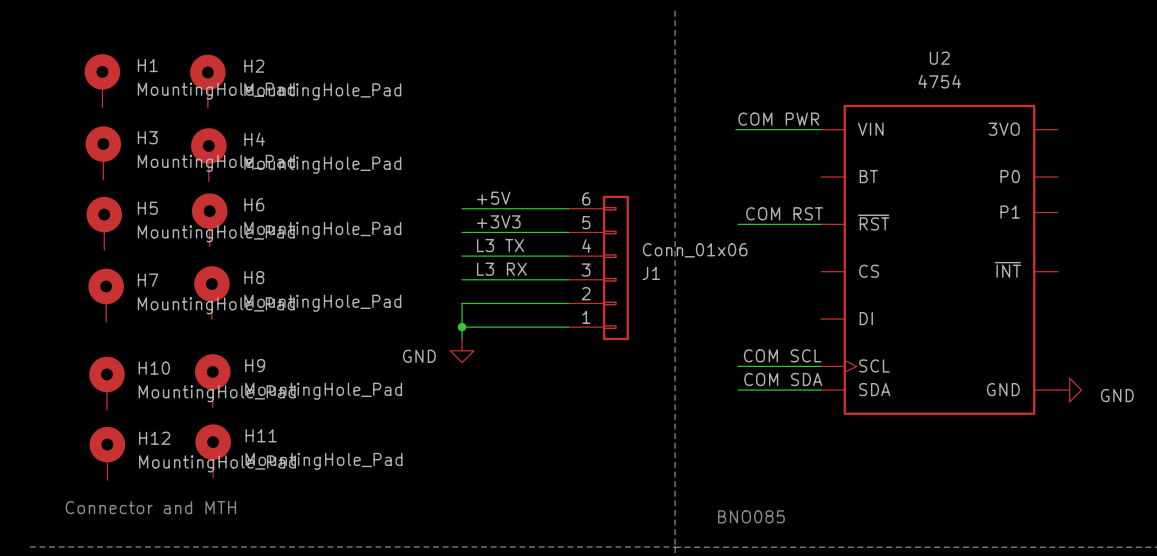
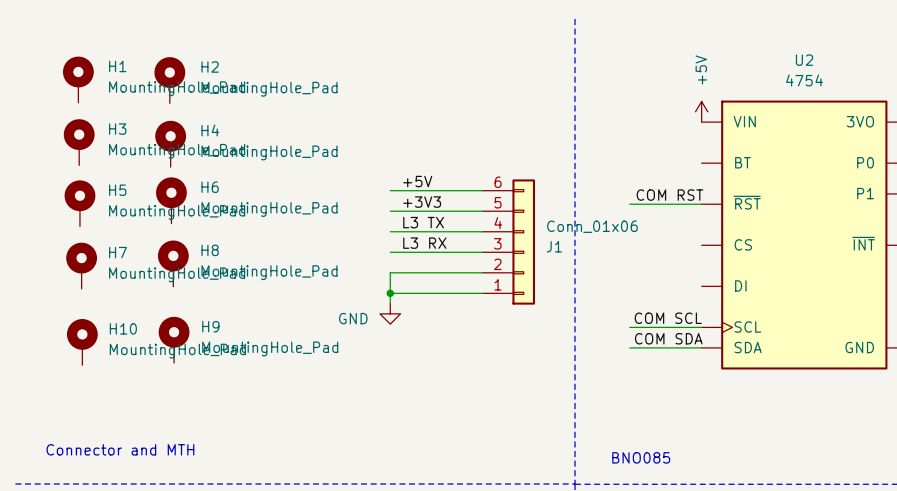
power symbol: none -> +5V (701, 111)
label: COM PWR (778, 119) -> none
wire: (735, 129) (821, 129) -> none
H11: MountingHole_Pad (213, 450) -> none
H12: MountingHole_Pad (107, 453) -> none

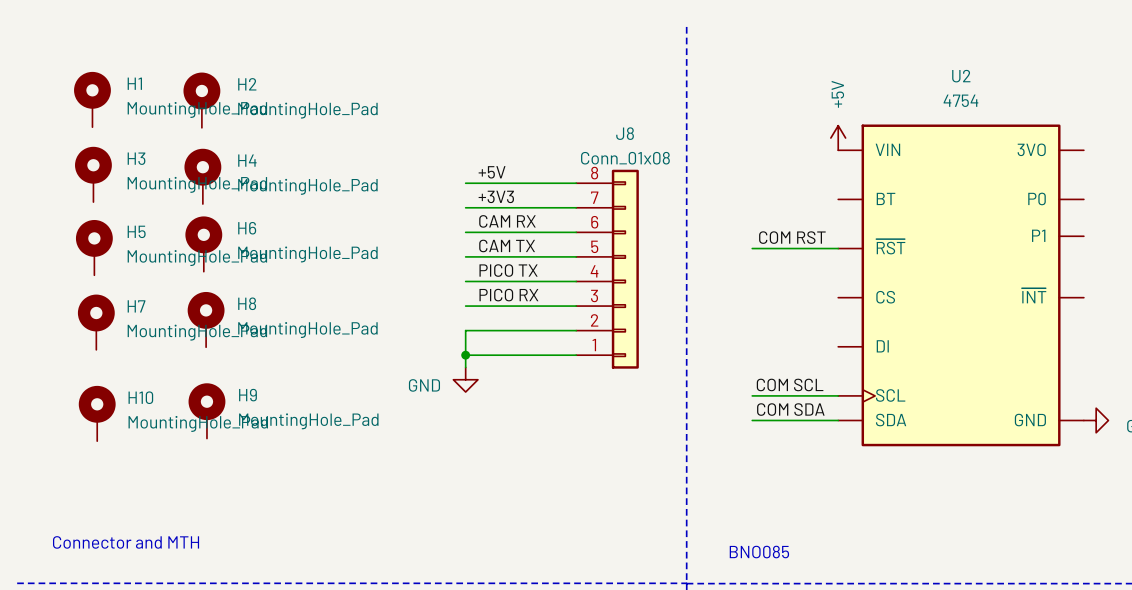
label: none -> +5V (492, 172)
wire: none -> (465, 183) (576, 183)
label: none -> +3V3 (496, 196)
wire: none -> (465, 207) (576, 207)
label: +5V (417, 181) -> CAM RX (507, 221)
label: +3V3 (422, 202) -> CAM TX (507, 245)
J8: none -> Conn_01x08 (607, 269)
label: L3 TX (423, 222) -> PICO TX (508, 270)
J1: Conn_01x06 (508, 242) -> none
label: L3 RX (424, 243) -> PICO RX (508, 295)

